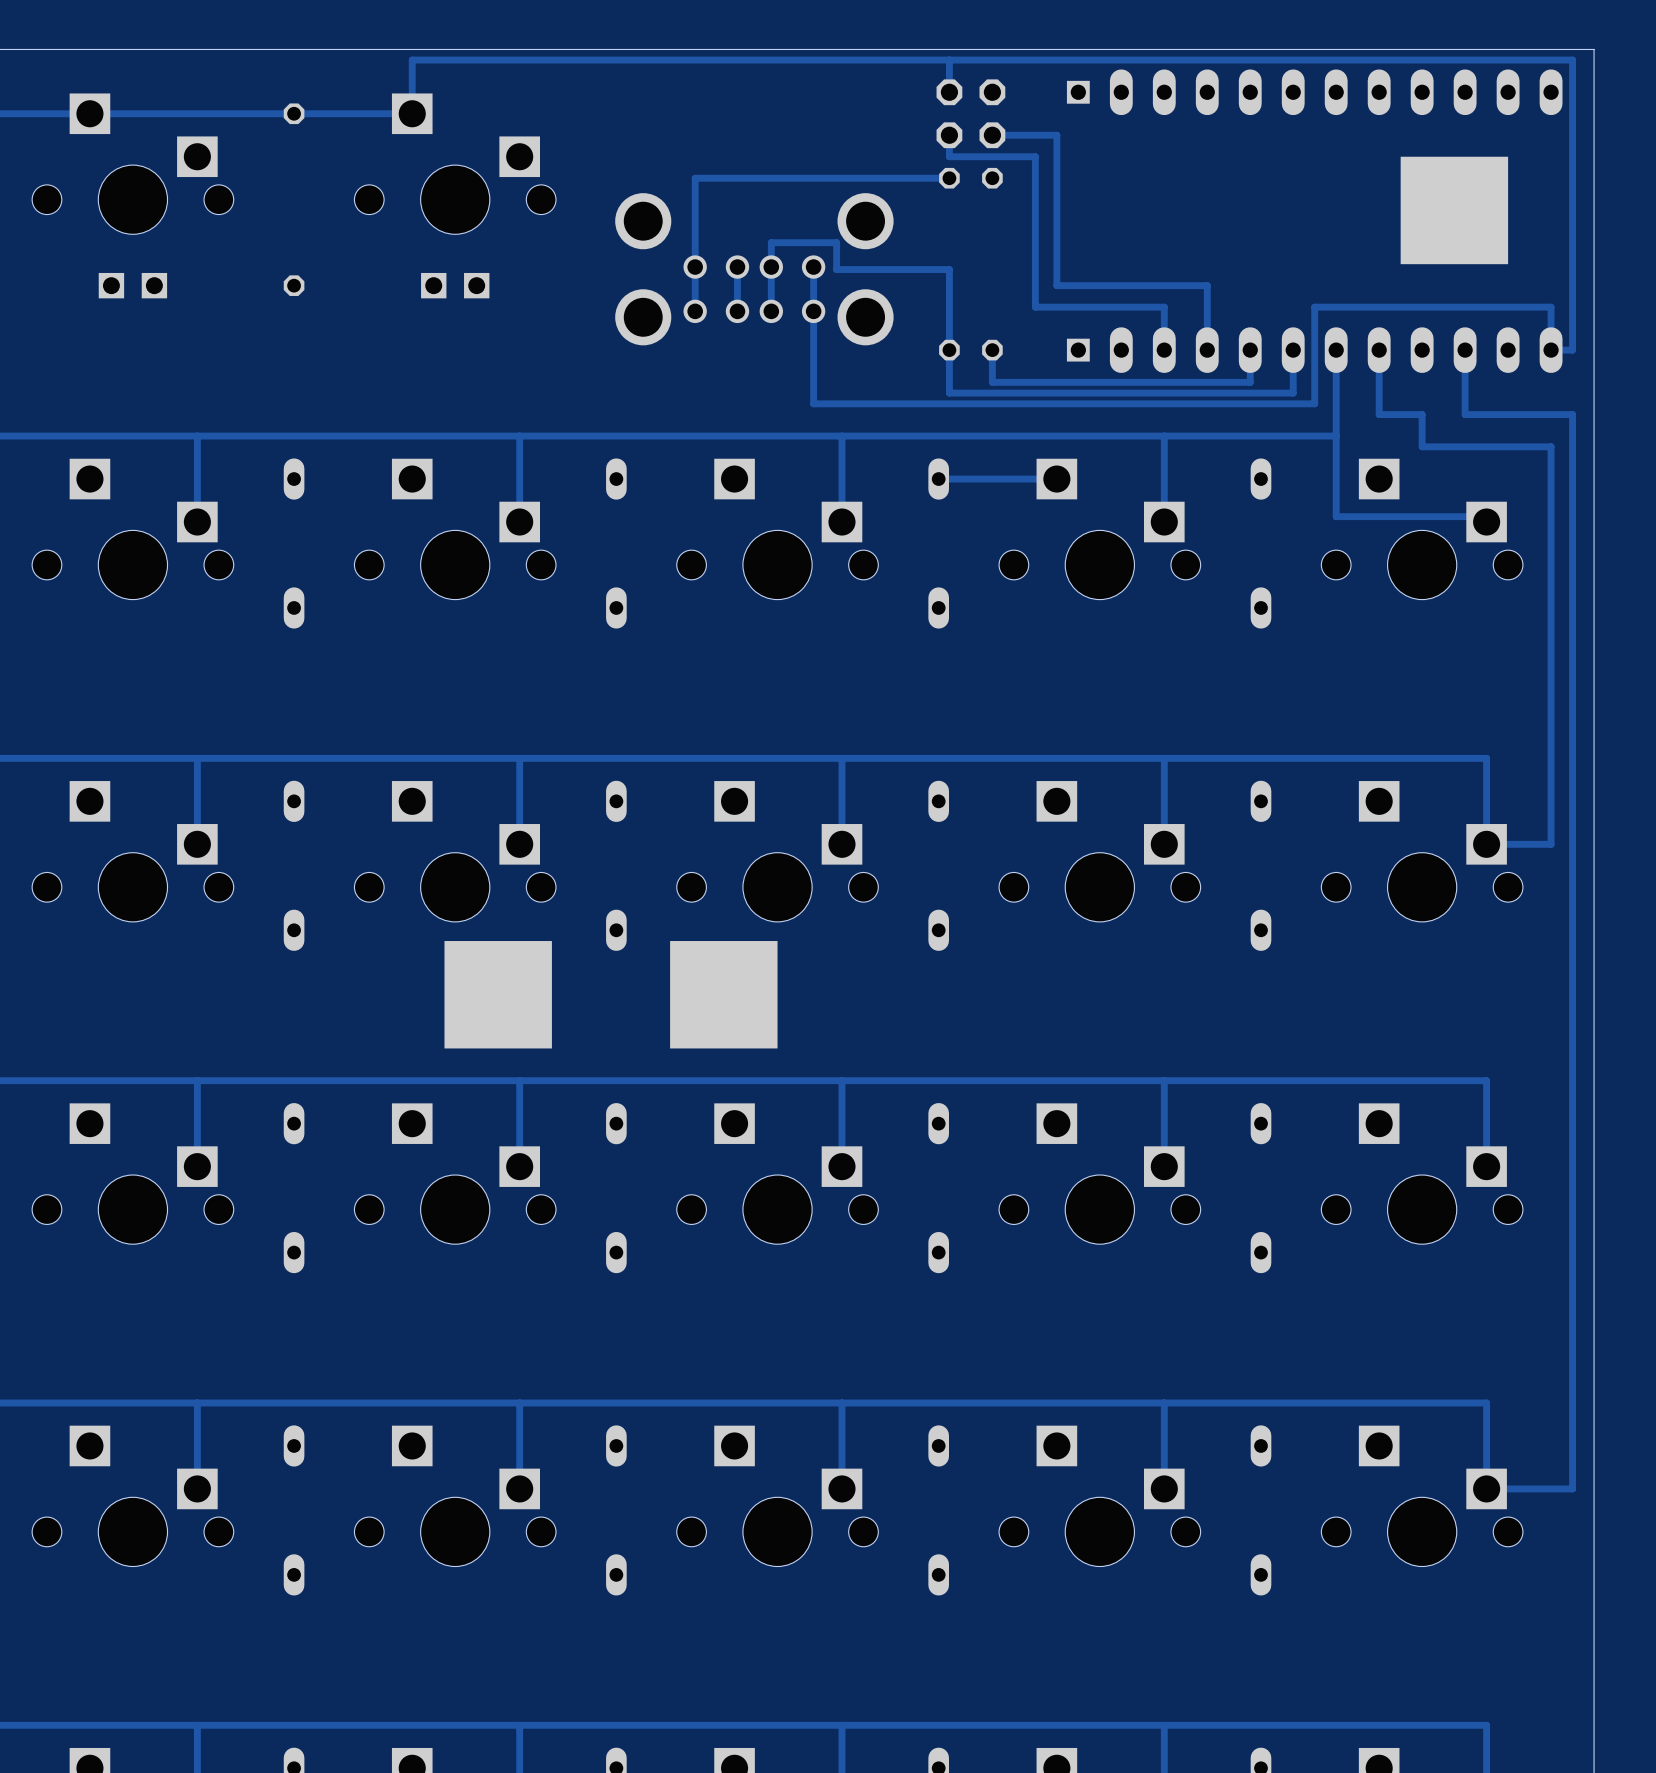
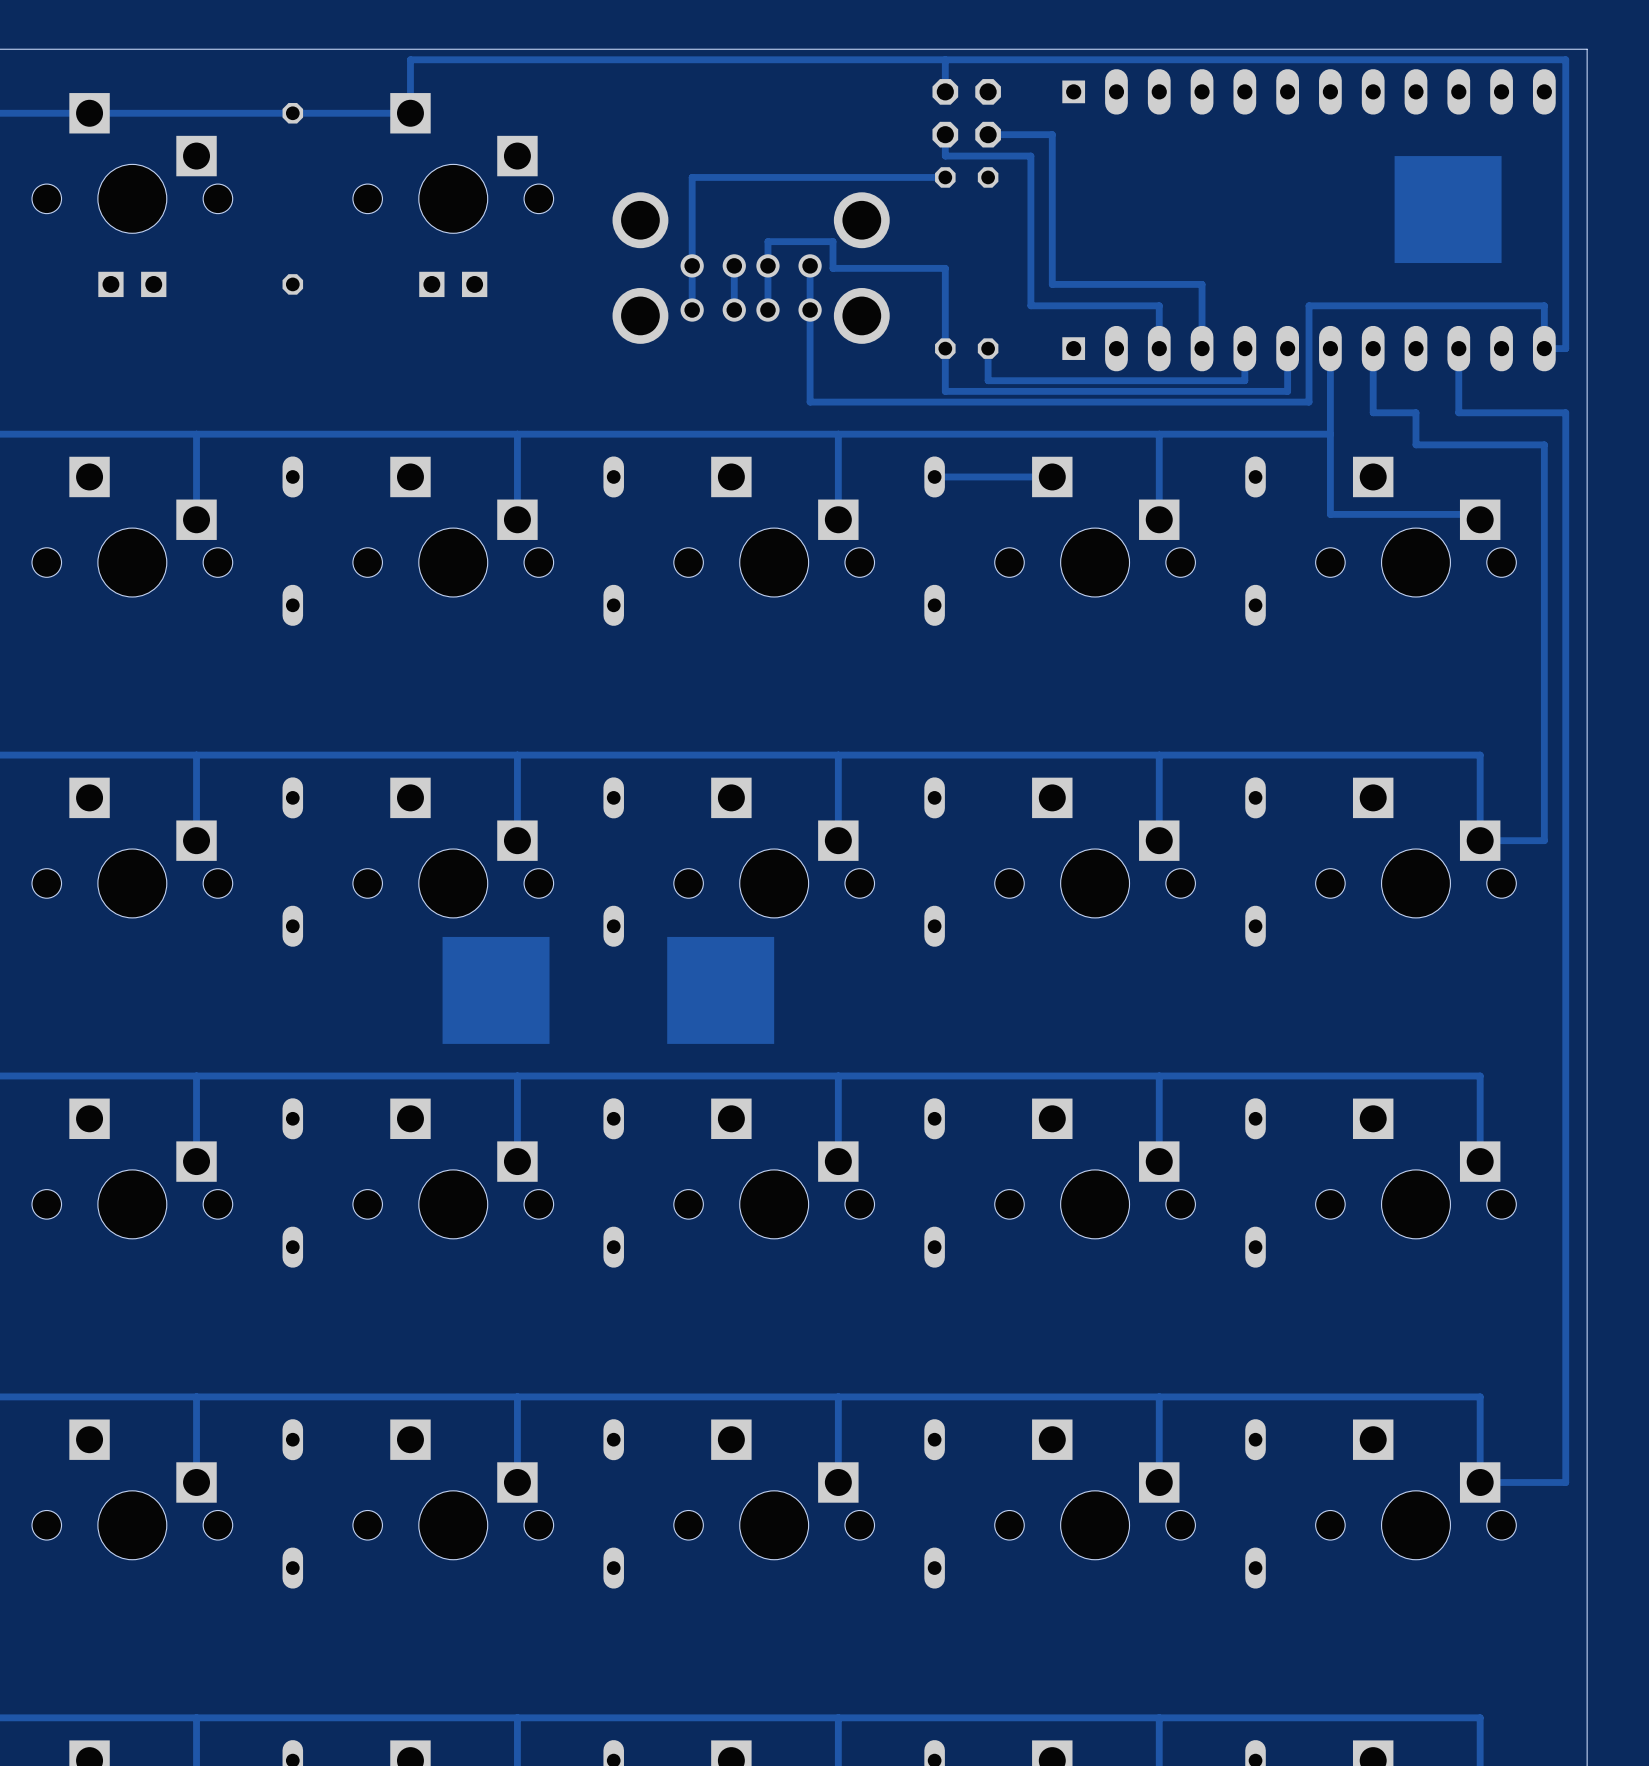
drawing: none -> [1394, 156, 1502, 264]
part: (1454, 210) -> none
drawing: none -> [442, 936, 550, 1044]
drawing: none -> [667, 936, 775, 1044]
part: (498, 994) -> none
part: (723, 994) -> none

